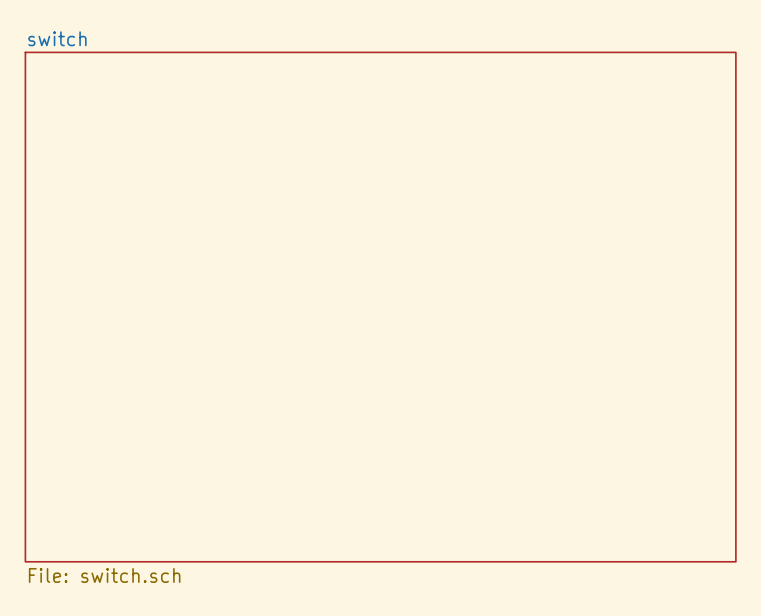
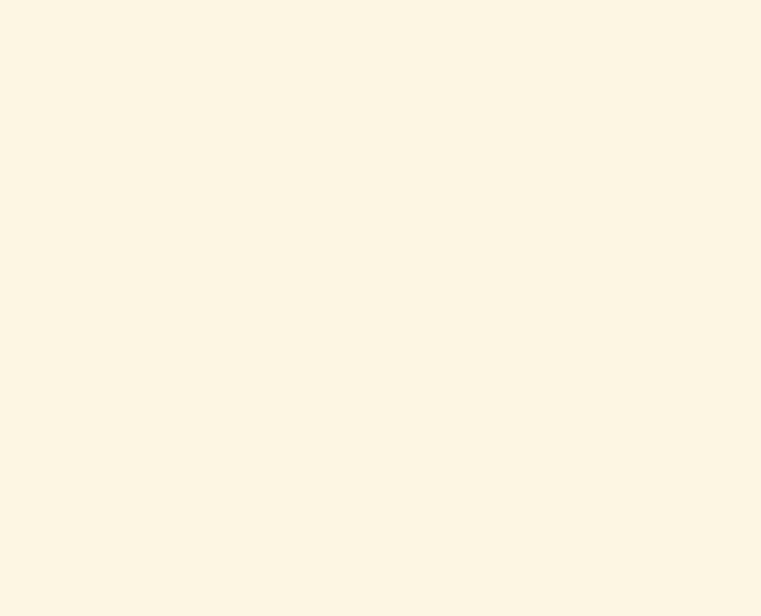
sheet switch: File: switch.sch (380, 307) -> none

